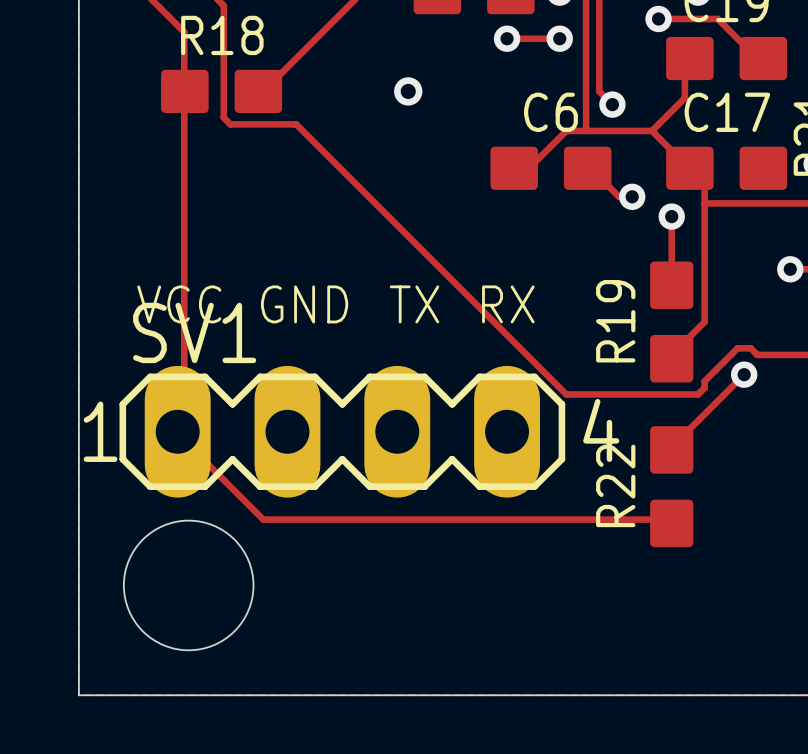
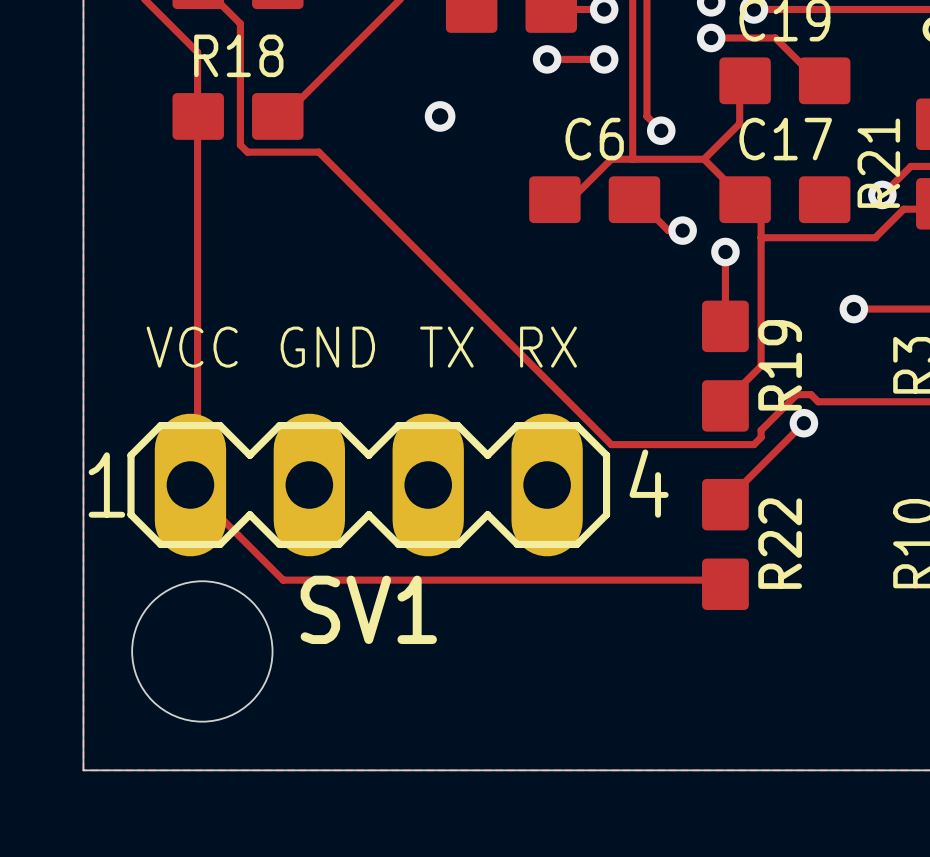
R19 name position: R19 (615, 321) -> R19 (780, 365)
SV1 name position: SV1 (194, 332) -> SV1 (368, 609)
R22 name position: R22 (615, 485) -> R22 (780, 543)

